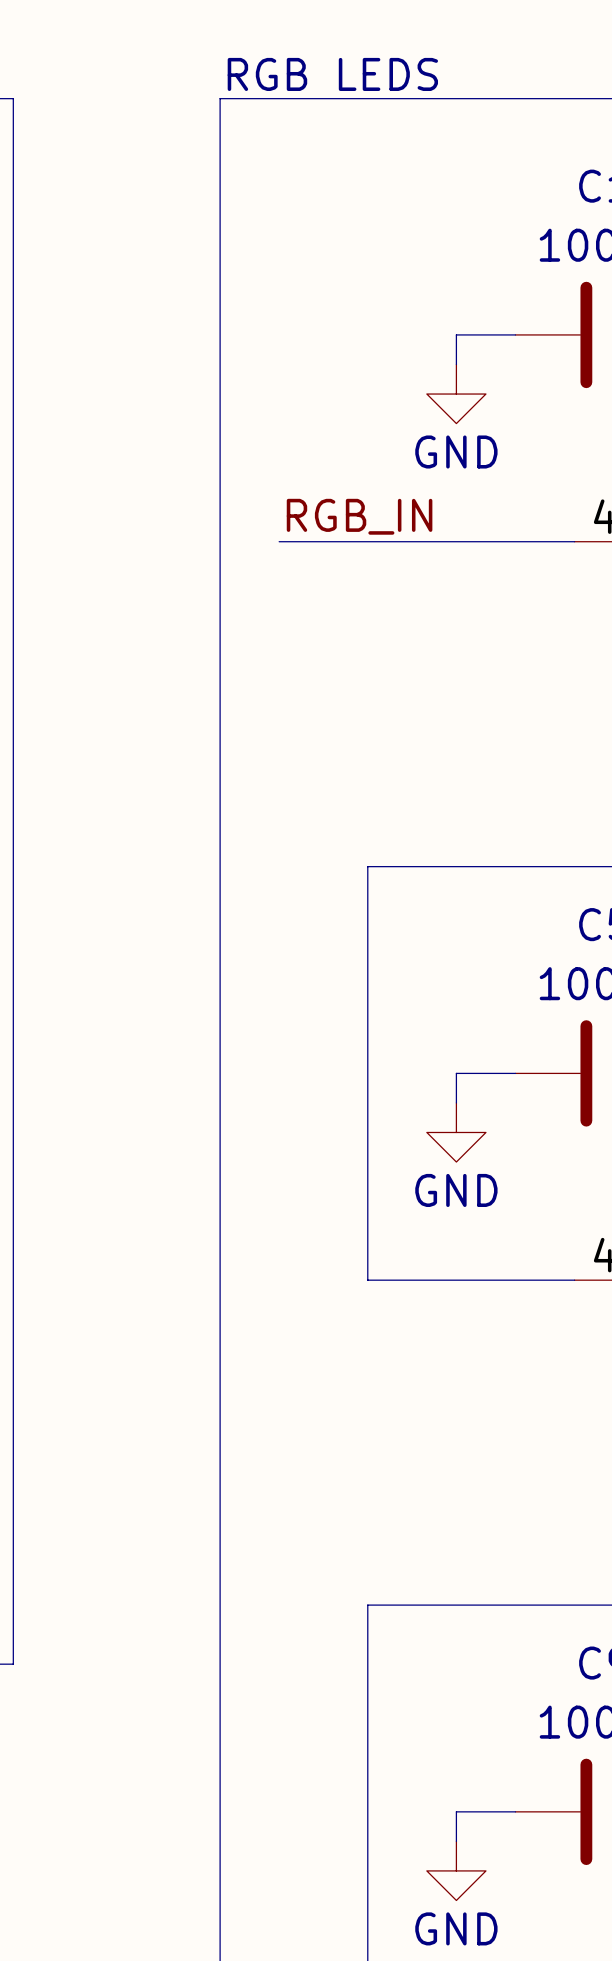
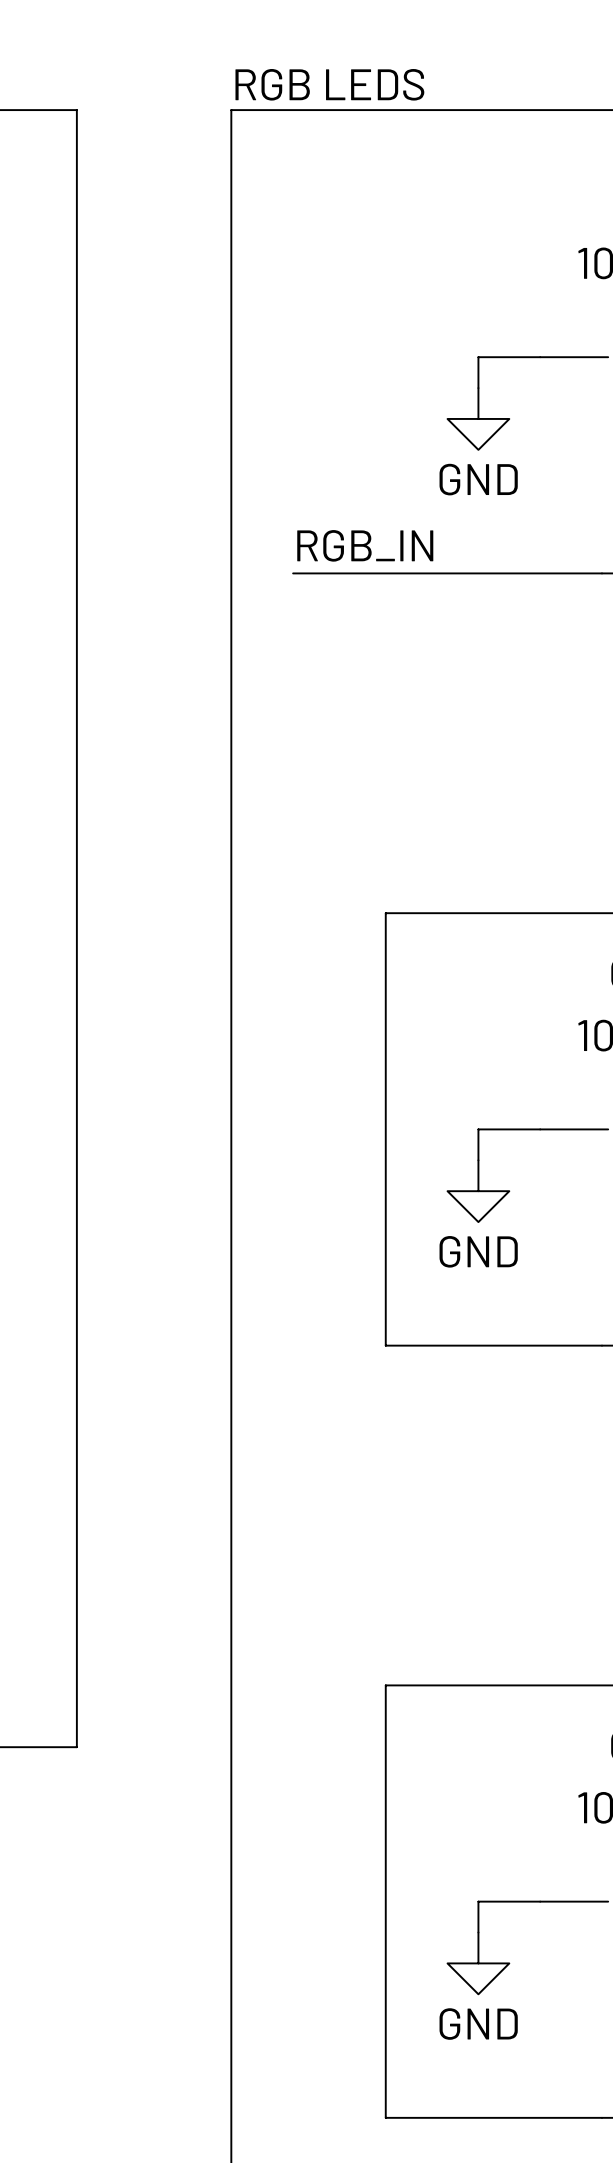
line: (13, 98) (13, 1664) -> (15, 110) (76, 110) (76, 1747) (15, 1747)

